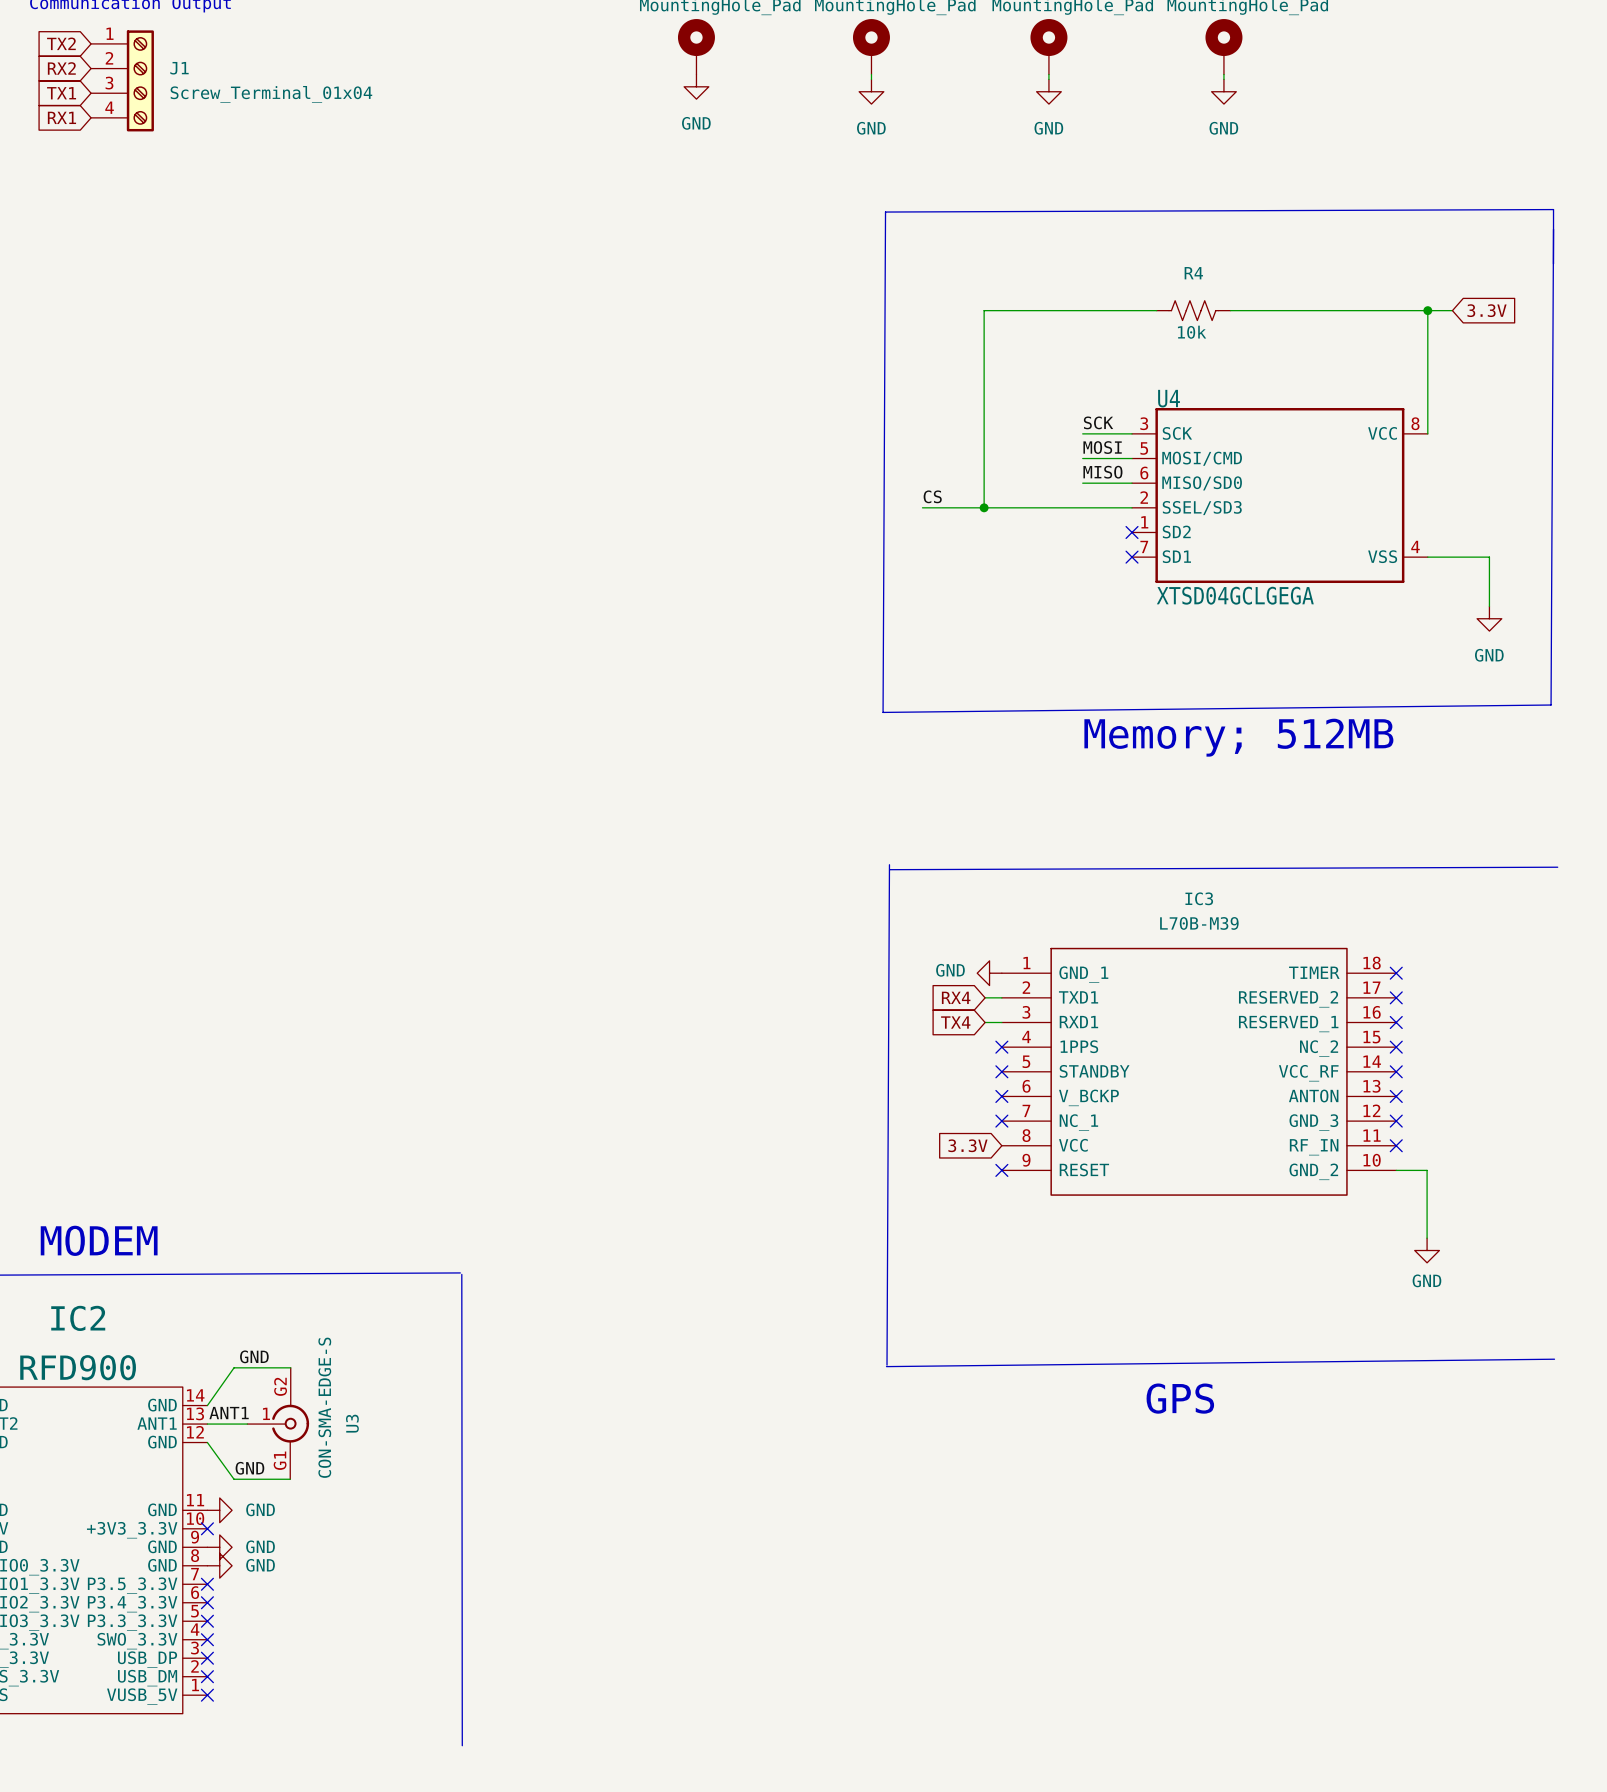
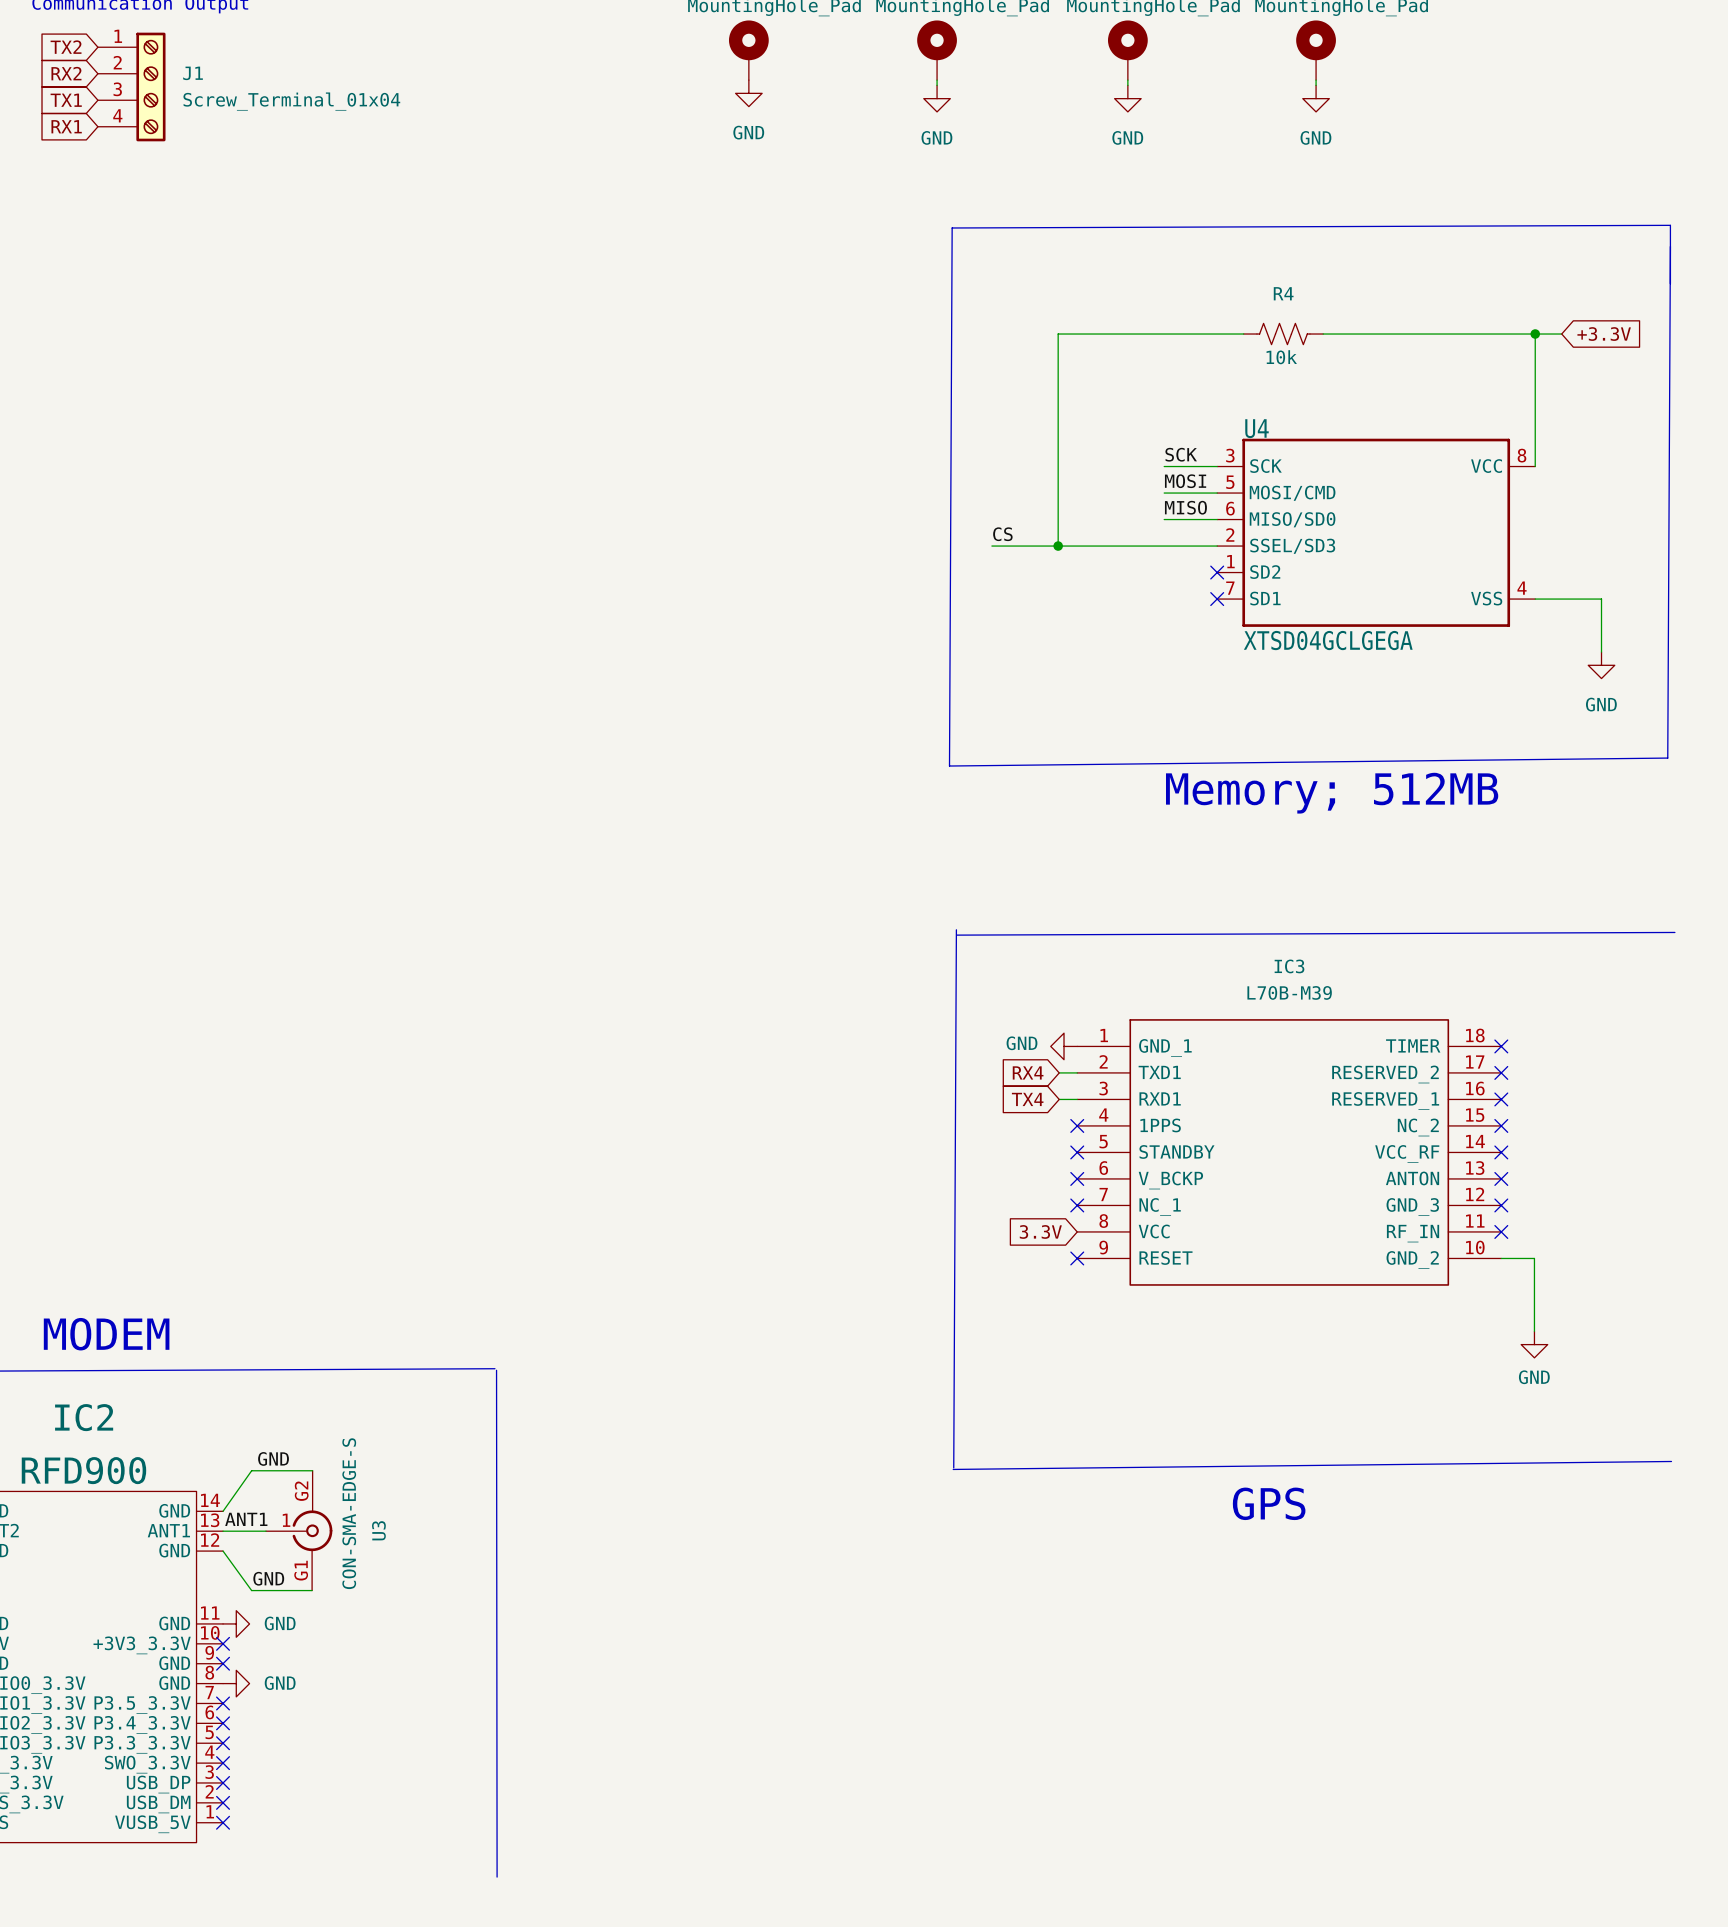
global label: 3.3V (1487, 310) -> +3.3V (1604, 334)
no-connect mark: none -> (223, 1663)
power symbol: GND (219, 1547) -> none

